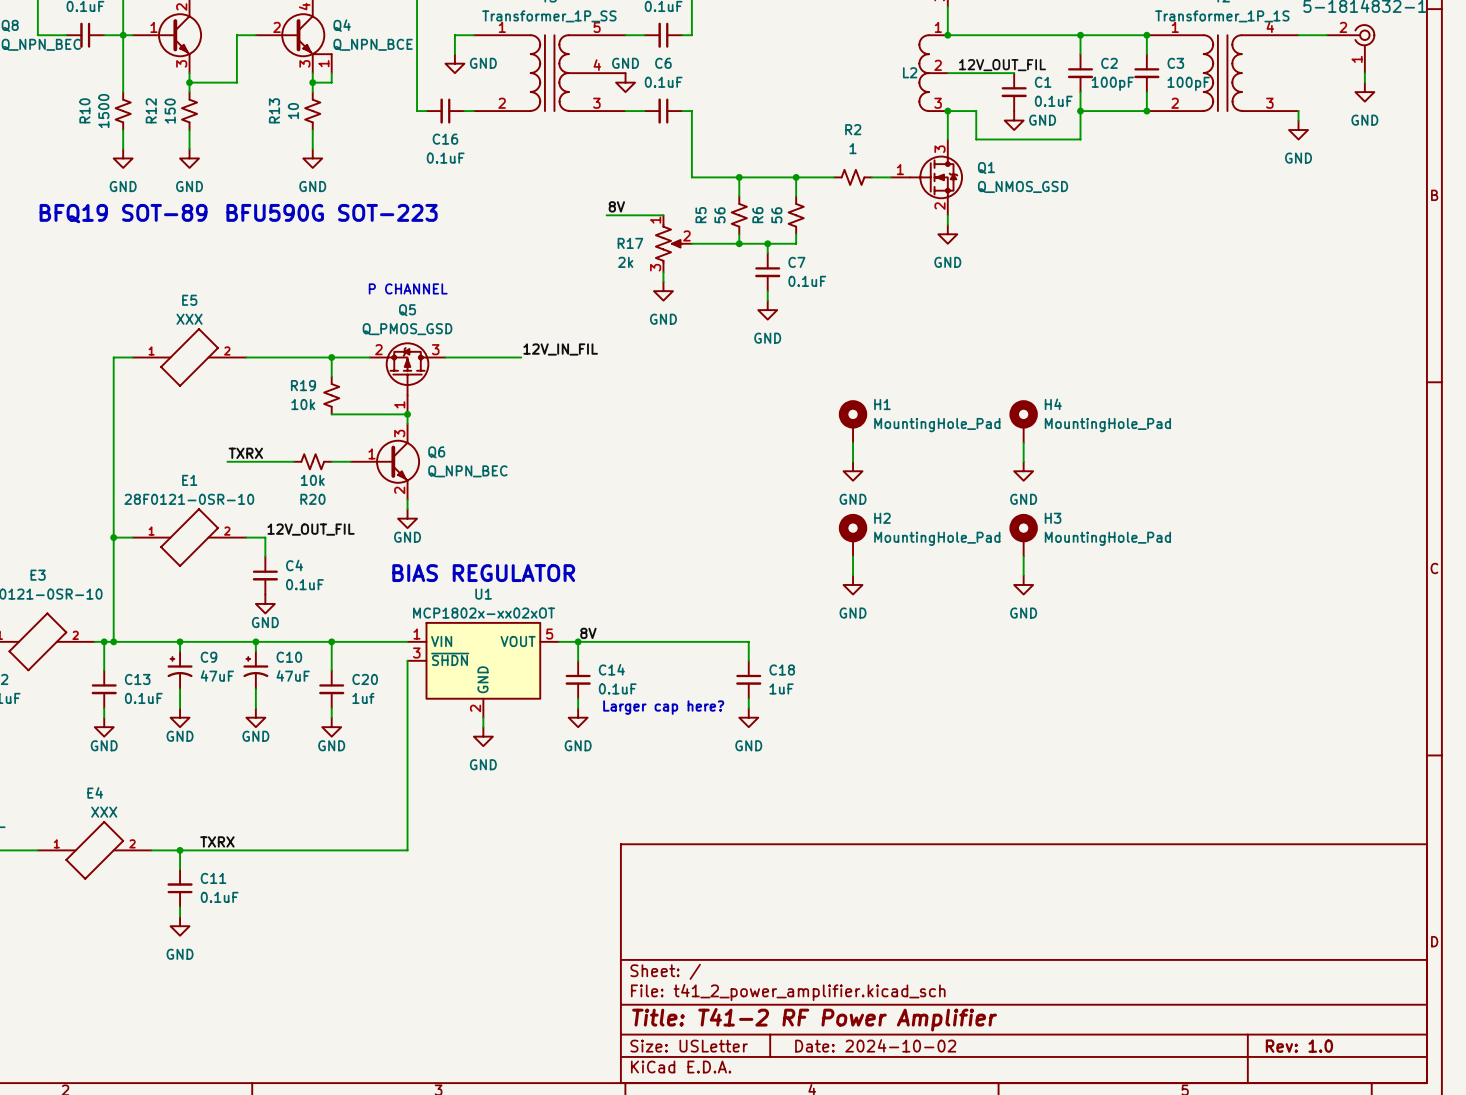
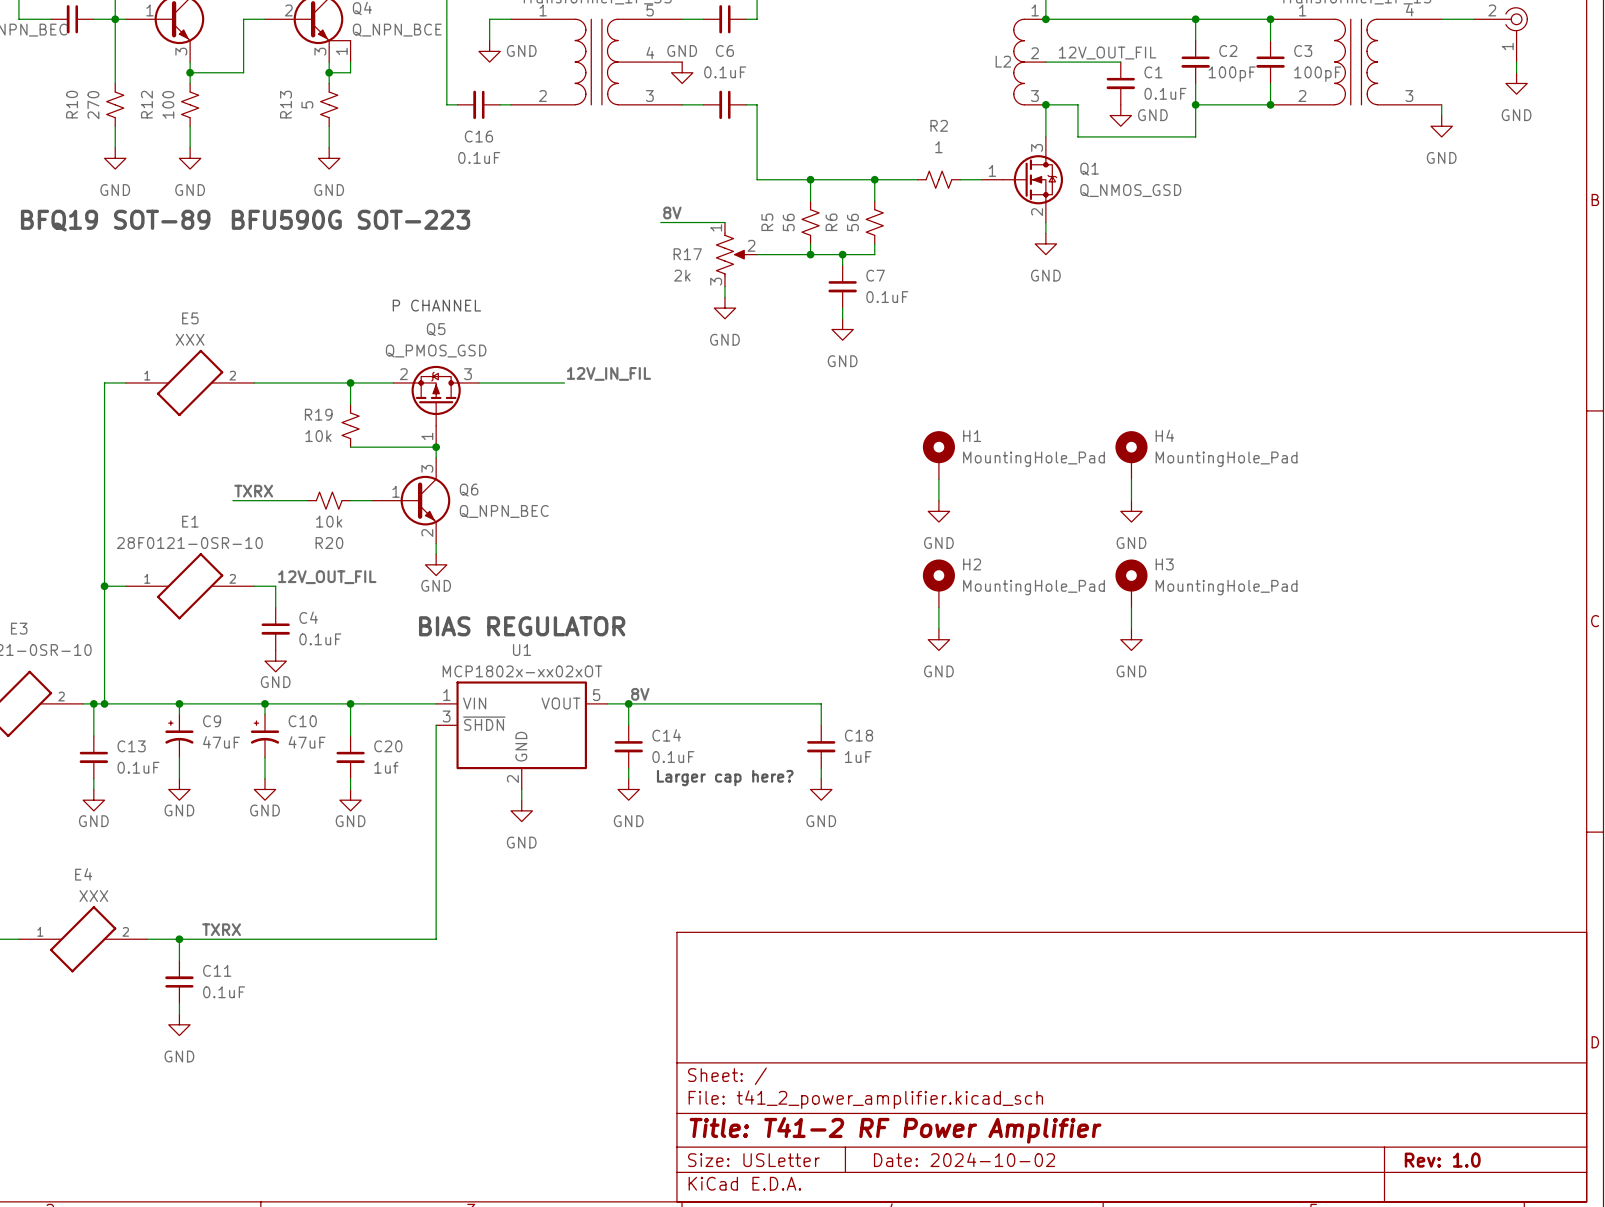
R10 value: 1500 (103, 111) -> 270 (93, 105)
R12 value: 150 (170, 111) -> 100 (168, 104)
R13 value: 10 (293, 111) -> 5 (307, 104)

